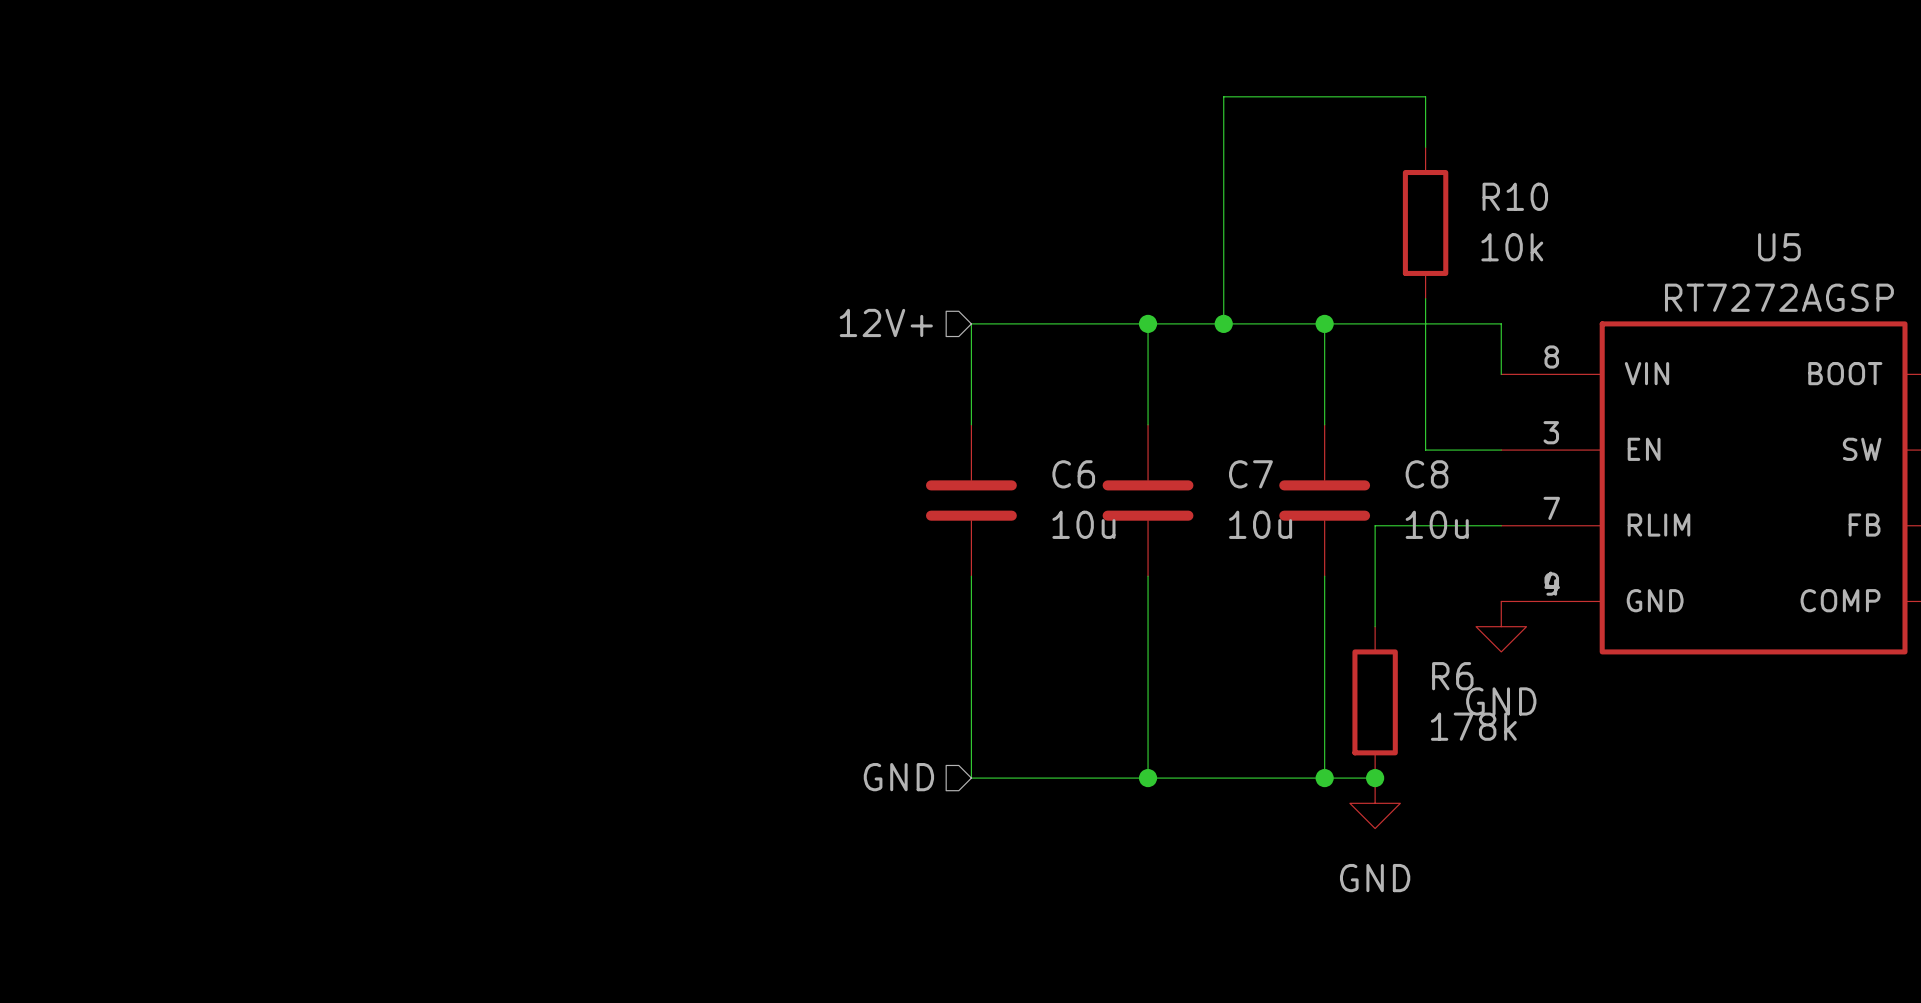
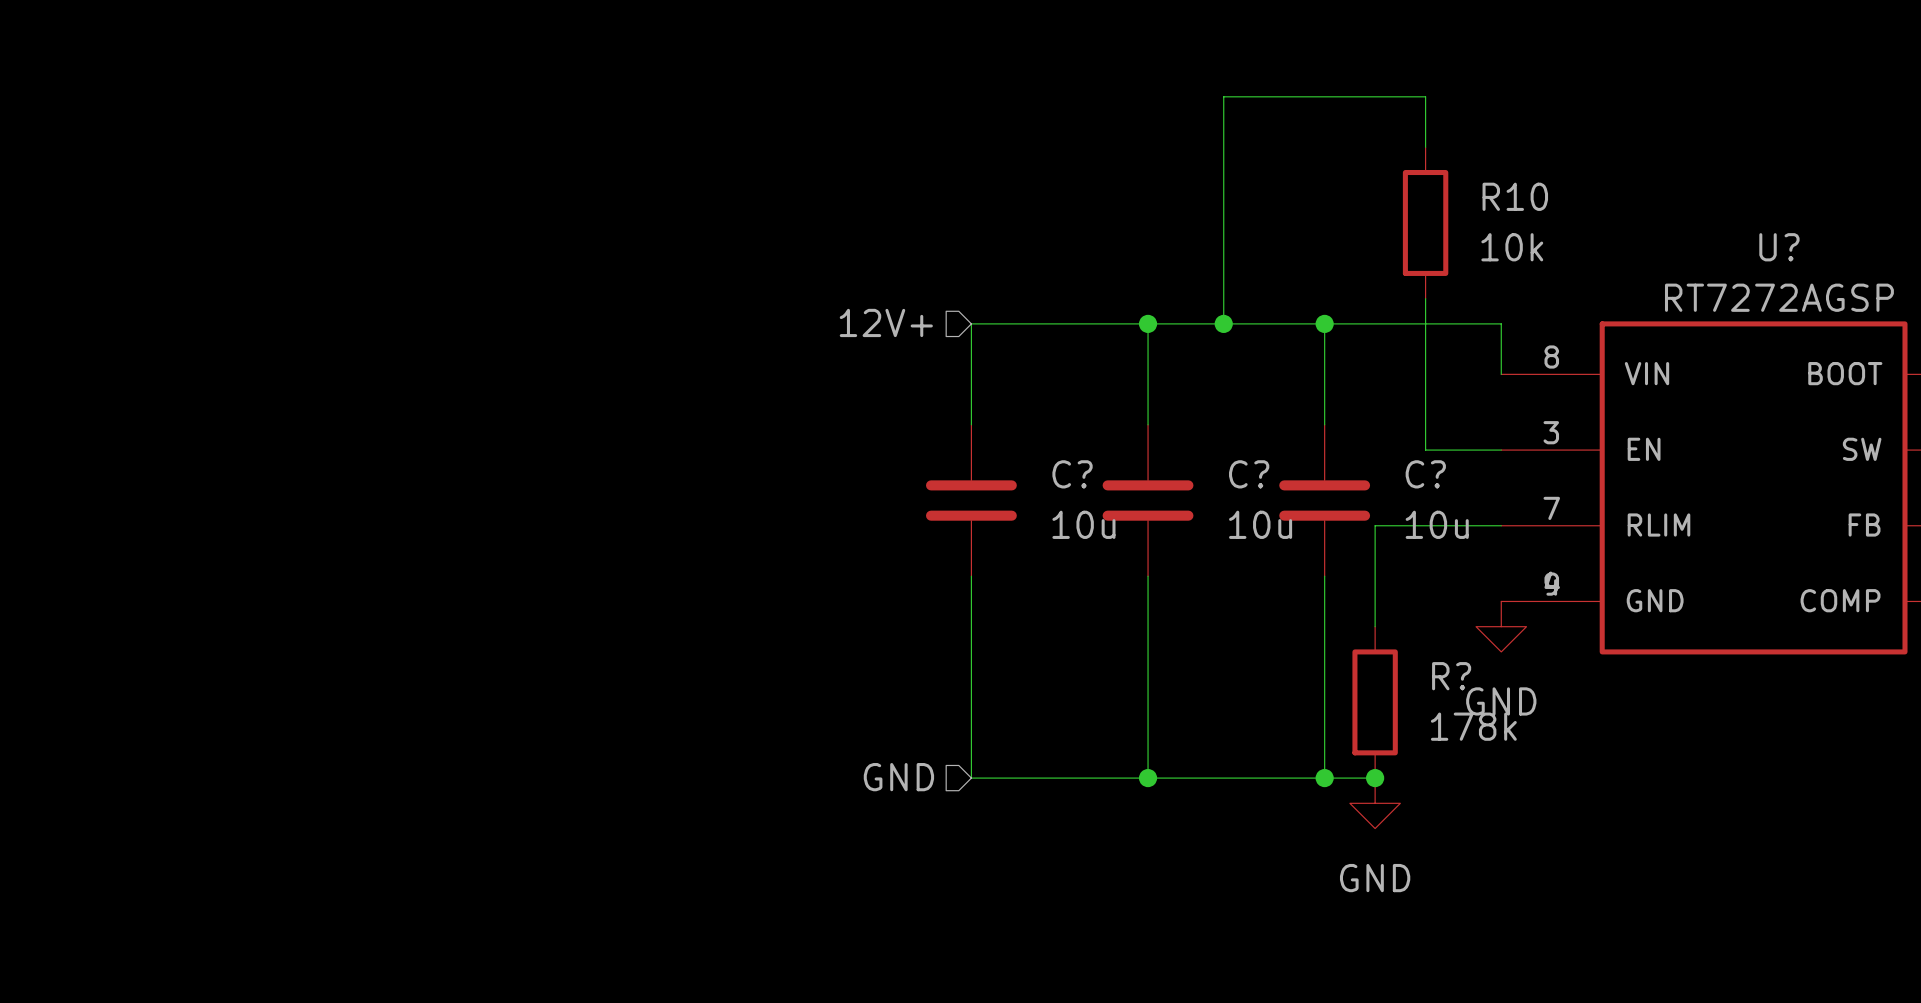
U5 name: U5 (1779, 247) -> U? (1779, 247)
C6 name: C6 (1073, 474) -> C? (1072, 474)
C7 name: C7 (1250, 474) -> C? (1249, 474)
C8 name: C8 (1426, 474) -> C? (1425, 474)
R6 name: R6 (1452, 676) -> R? (1451, 676)

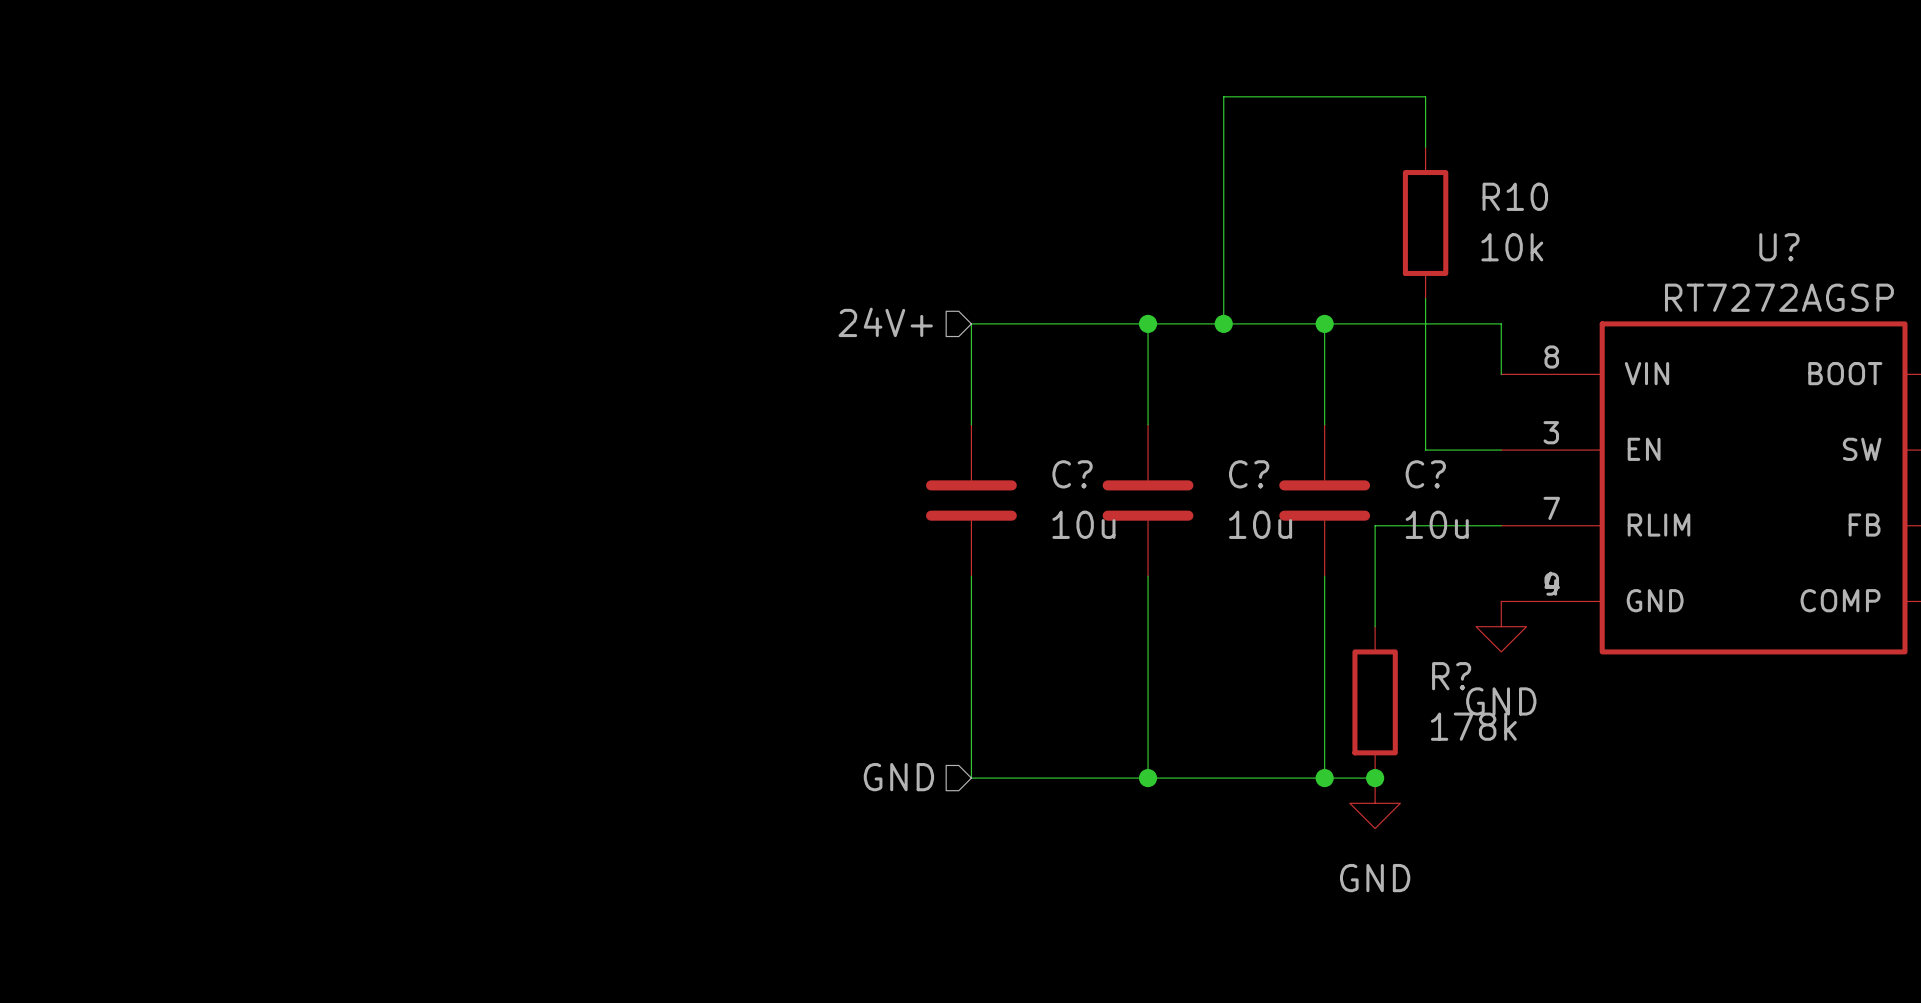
hierarchical label: 12V+ (886, 322) -> 24V+ (885, 322)

